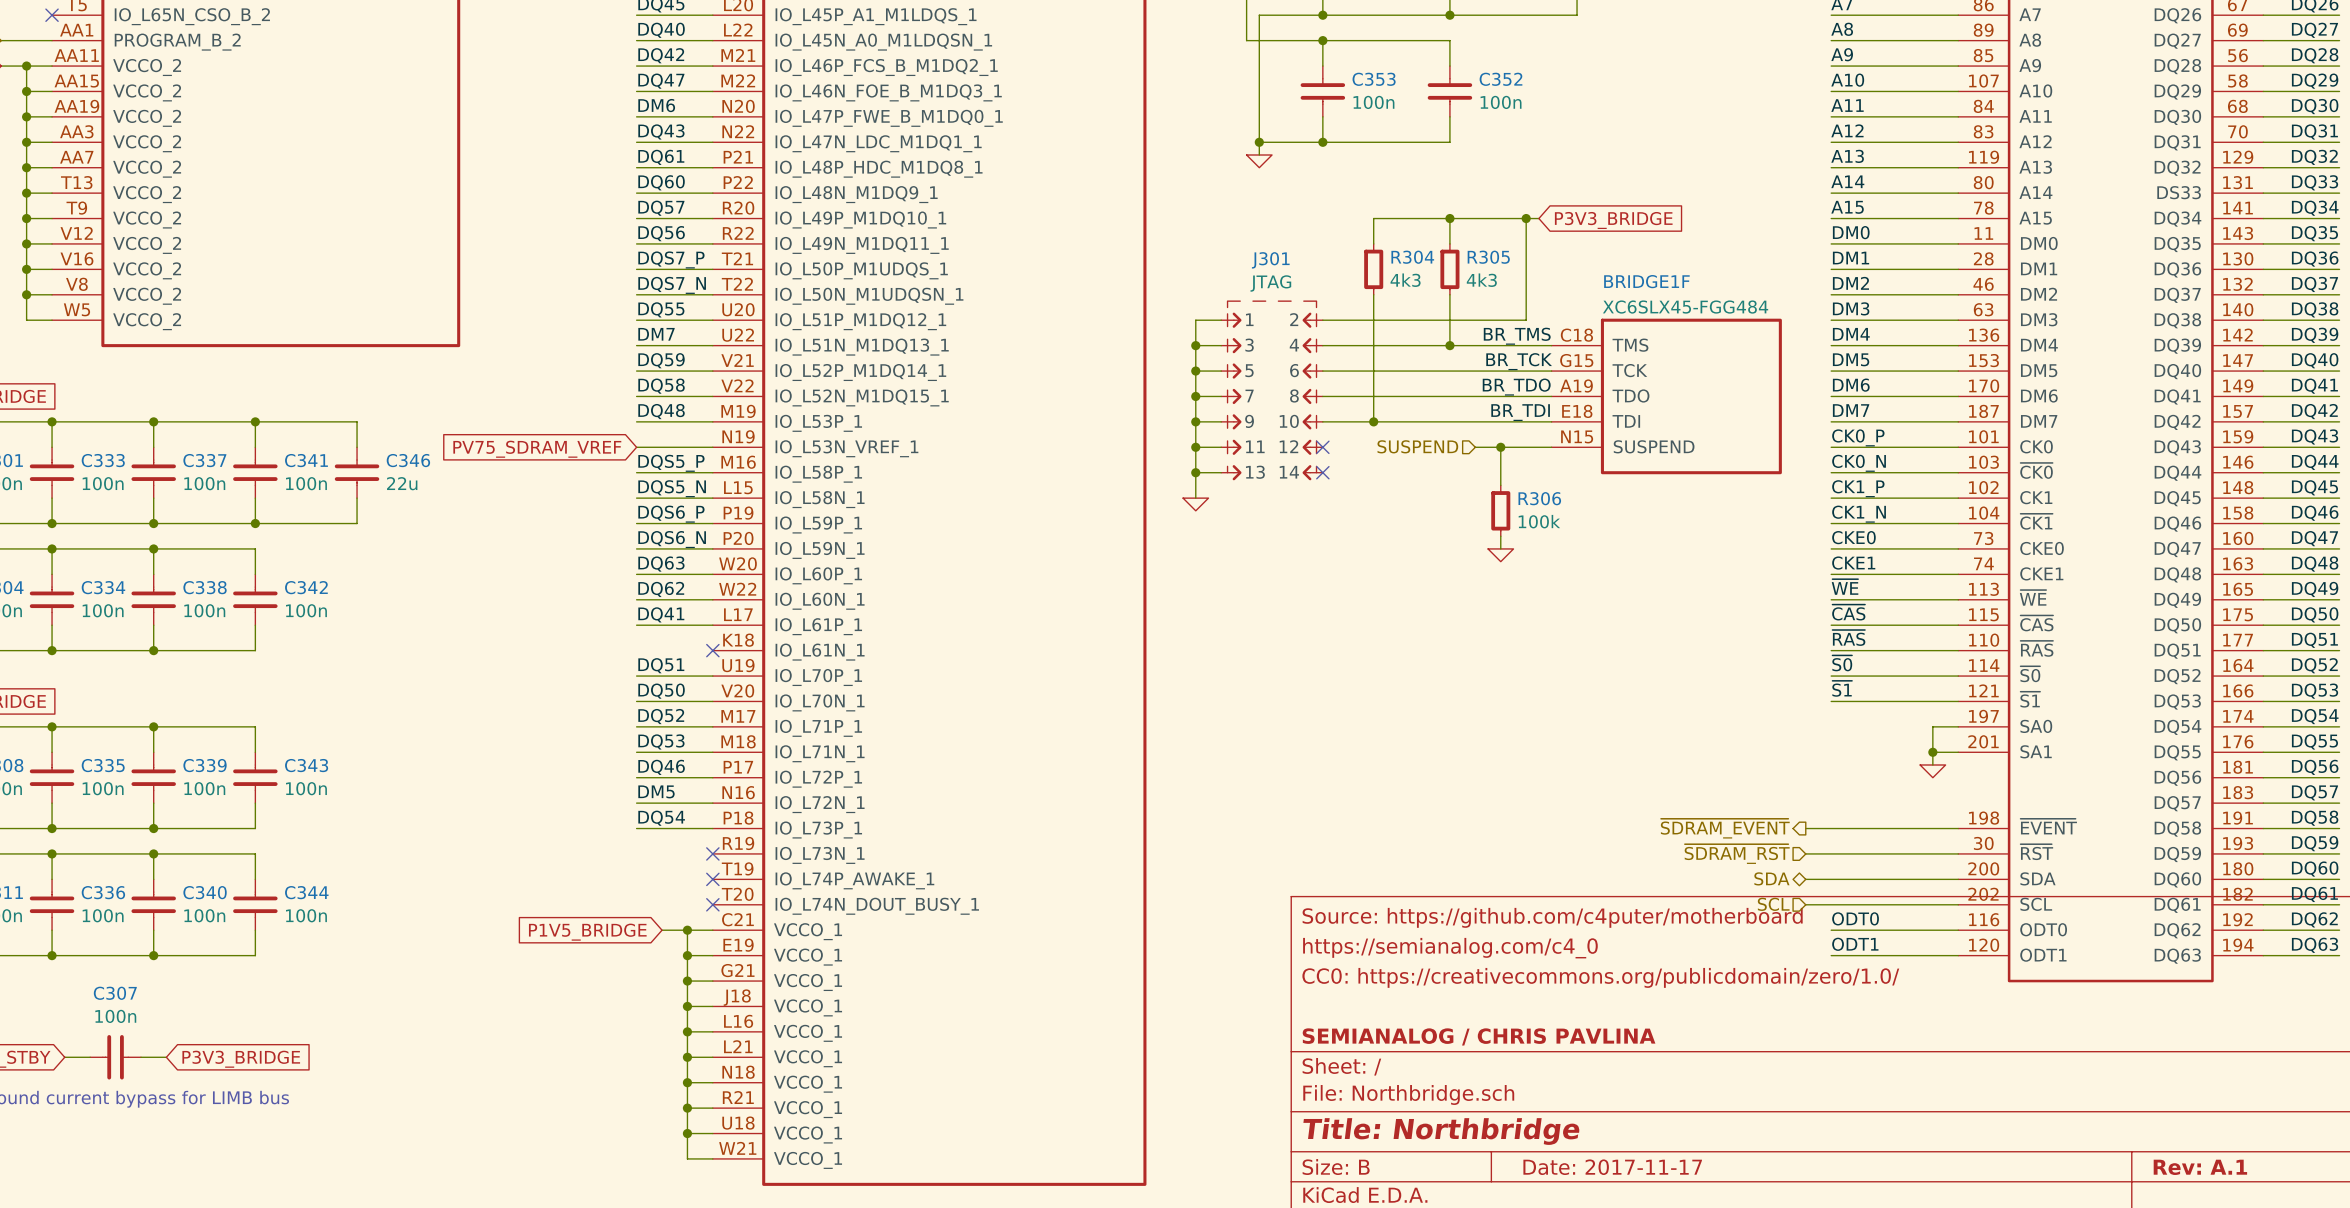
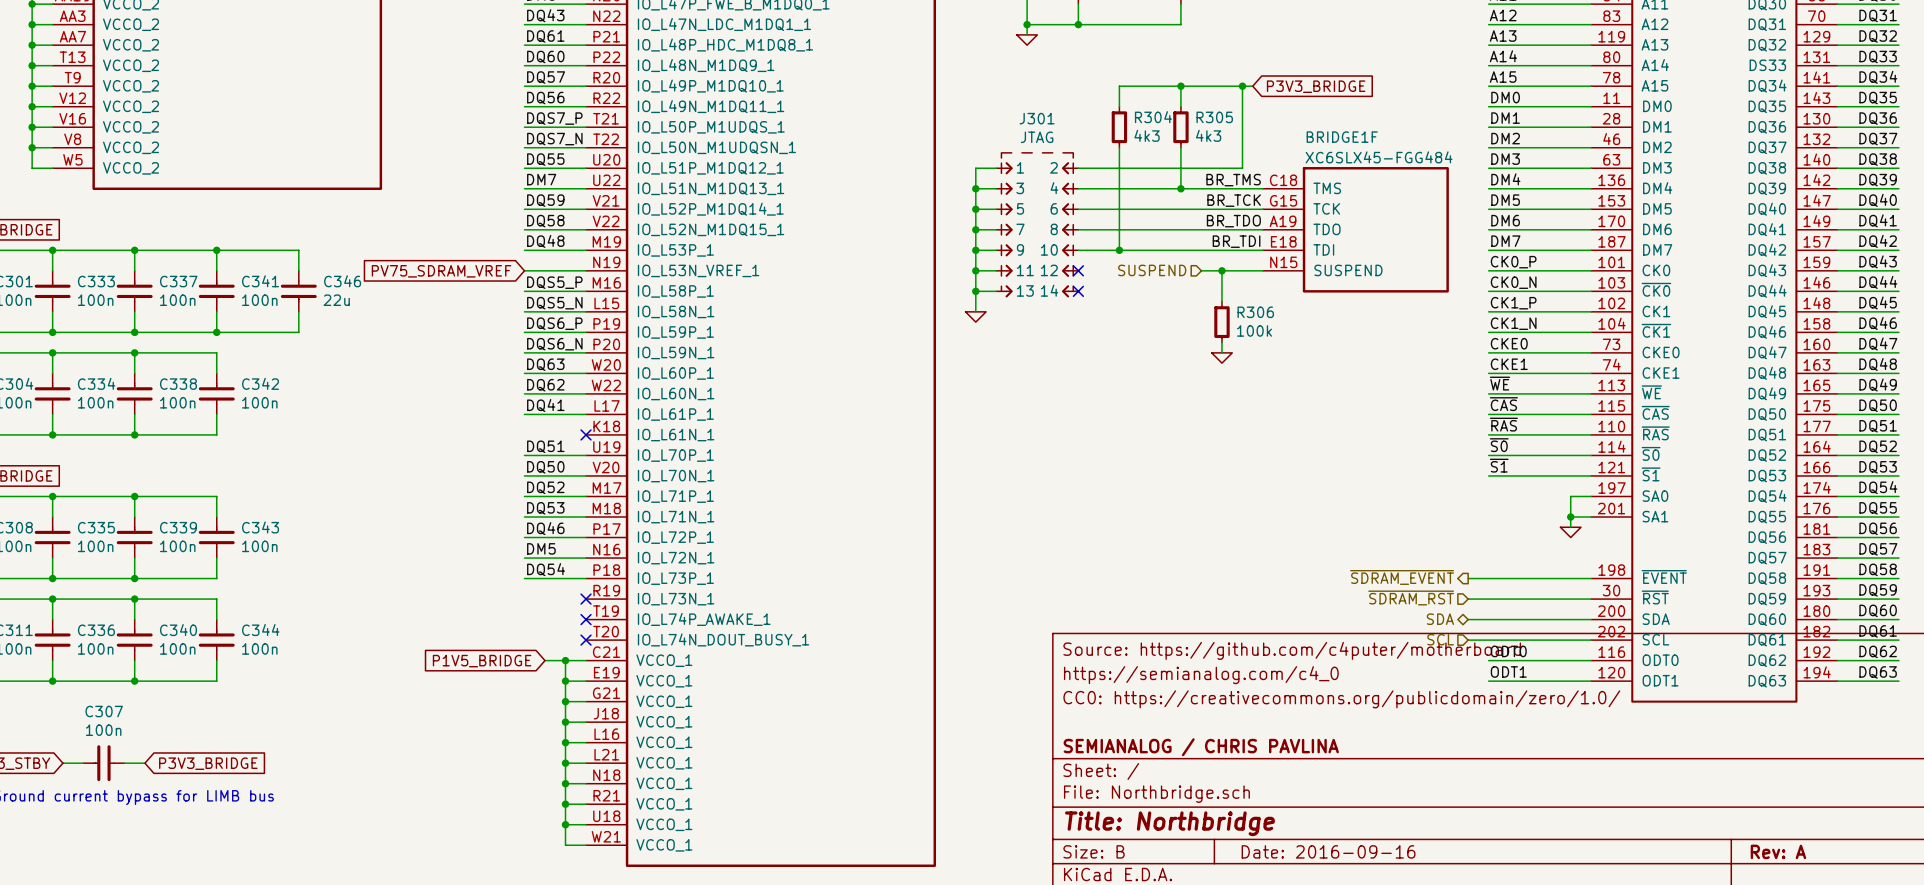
title block: Date: 2017-11-17 (1612, 1167) -> Date: 2016-09-16 (1328, 851)
title block: Rev: A.1 (2200, 1167) -> Rev: A (1778, 851)

